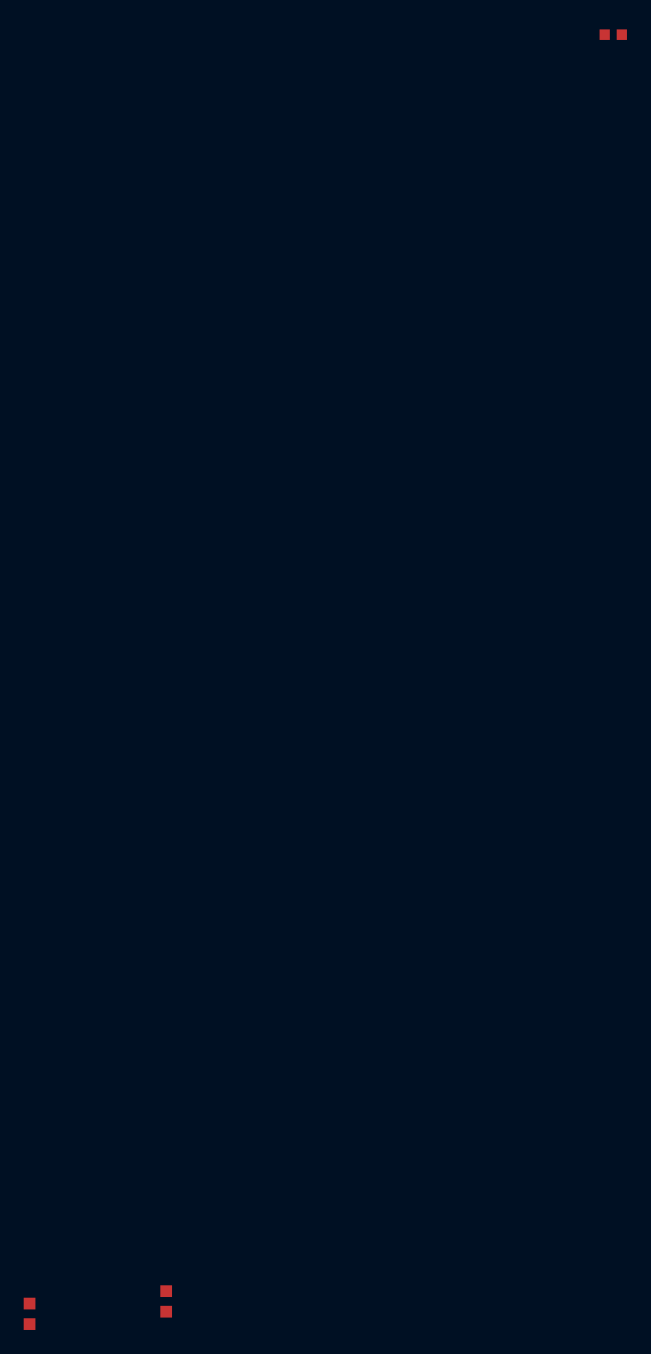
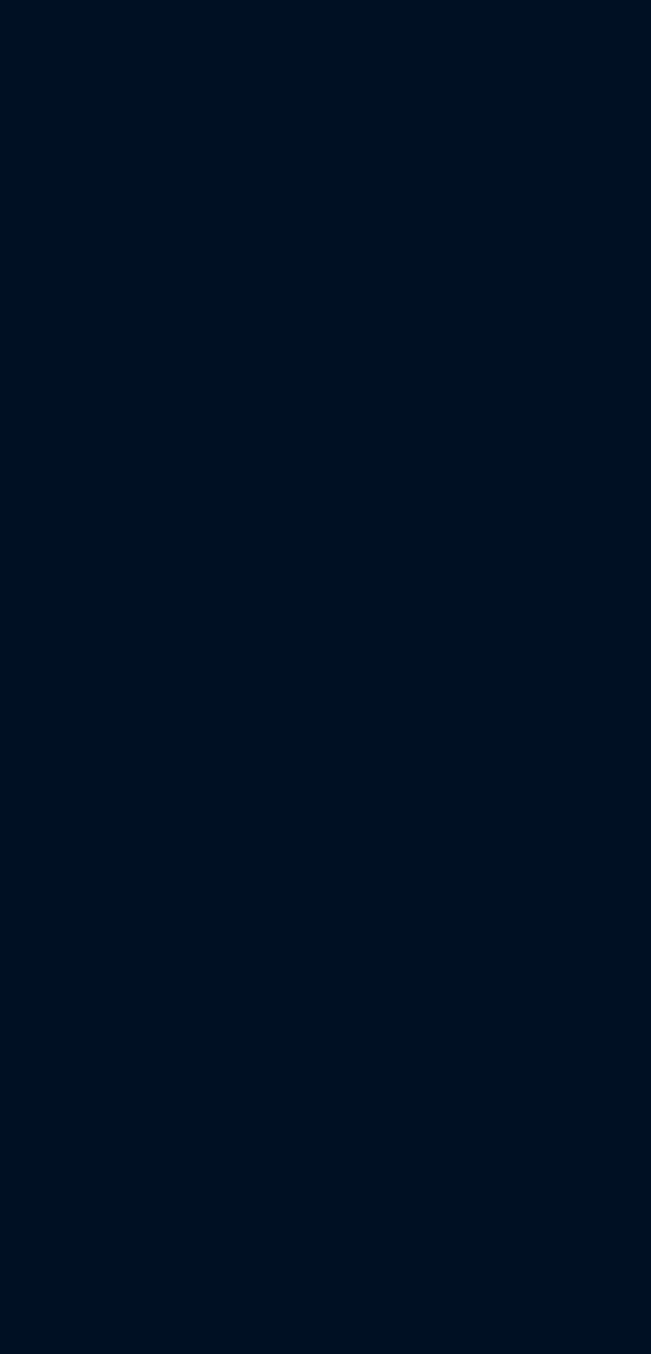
part: (613, 34) -> none
part: (166, 1301) -> none
part: (29, 1313) -> none

